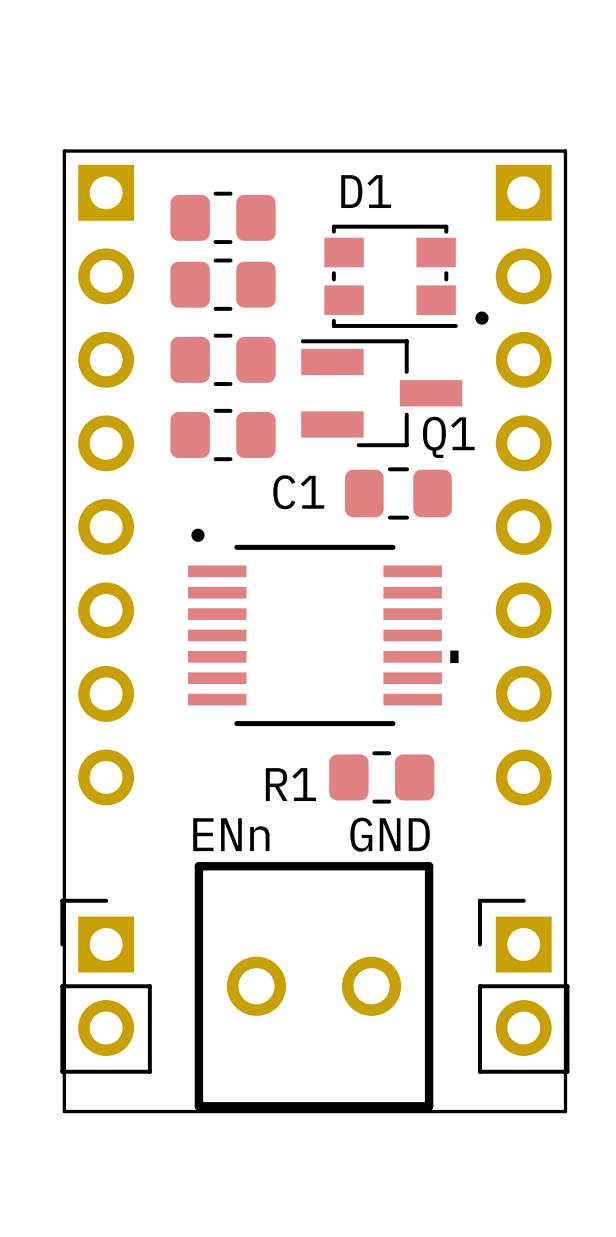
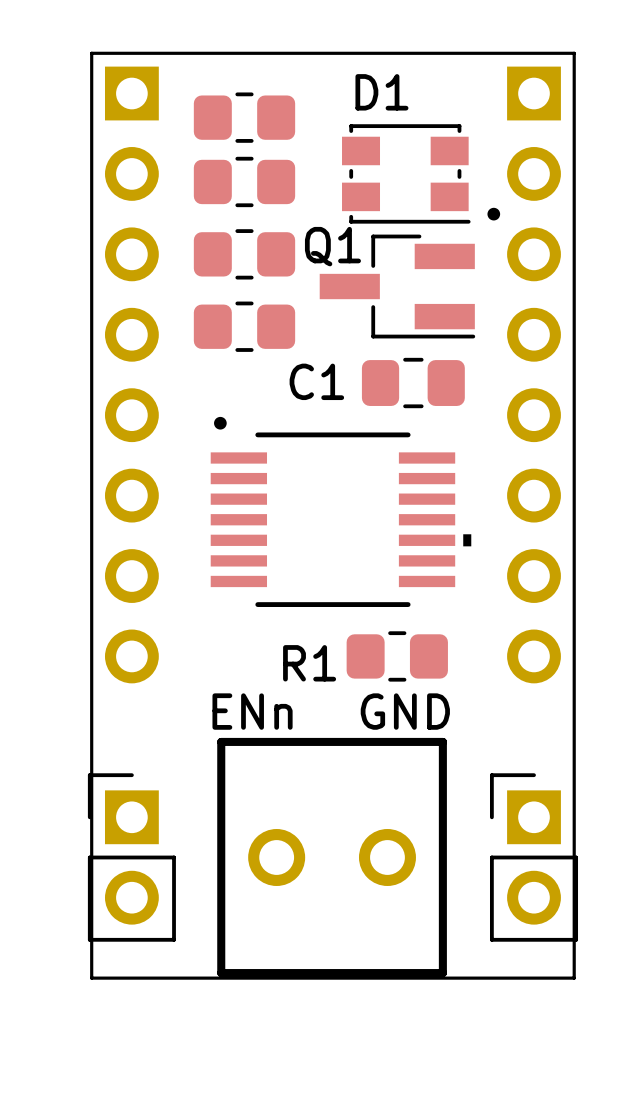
Q1 rotation: 0° (381, 393) -> 180° (397, 286)

